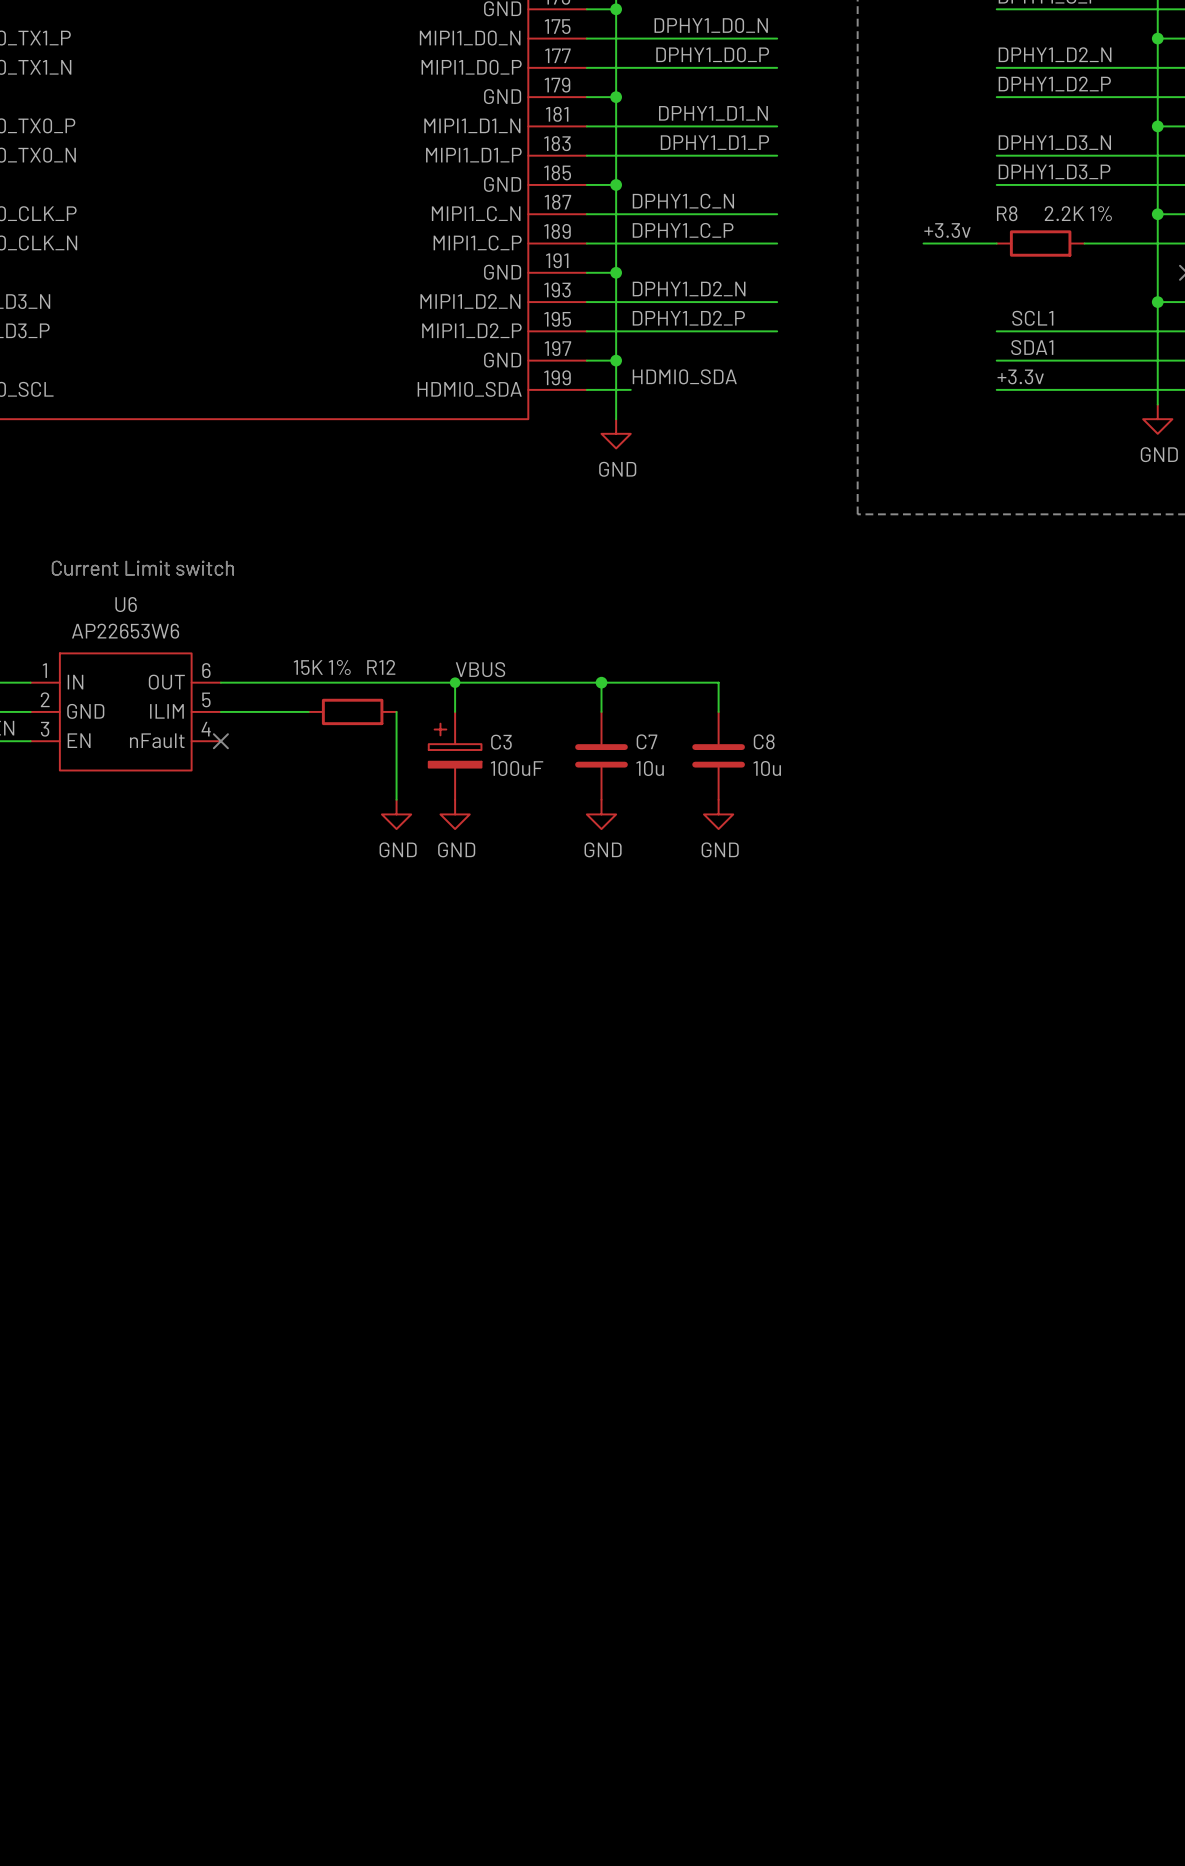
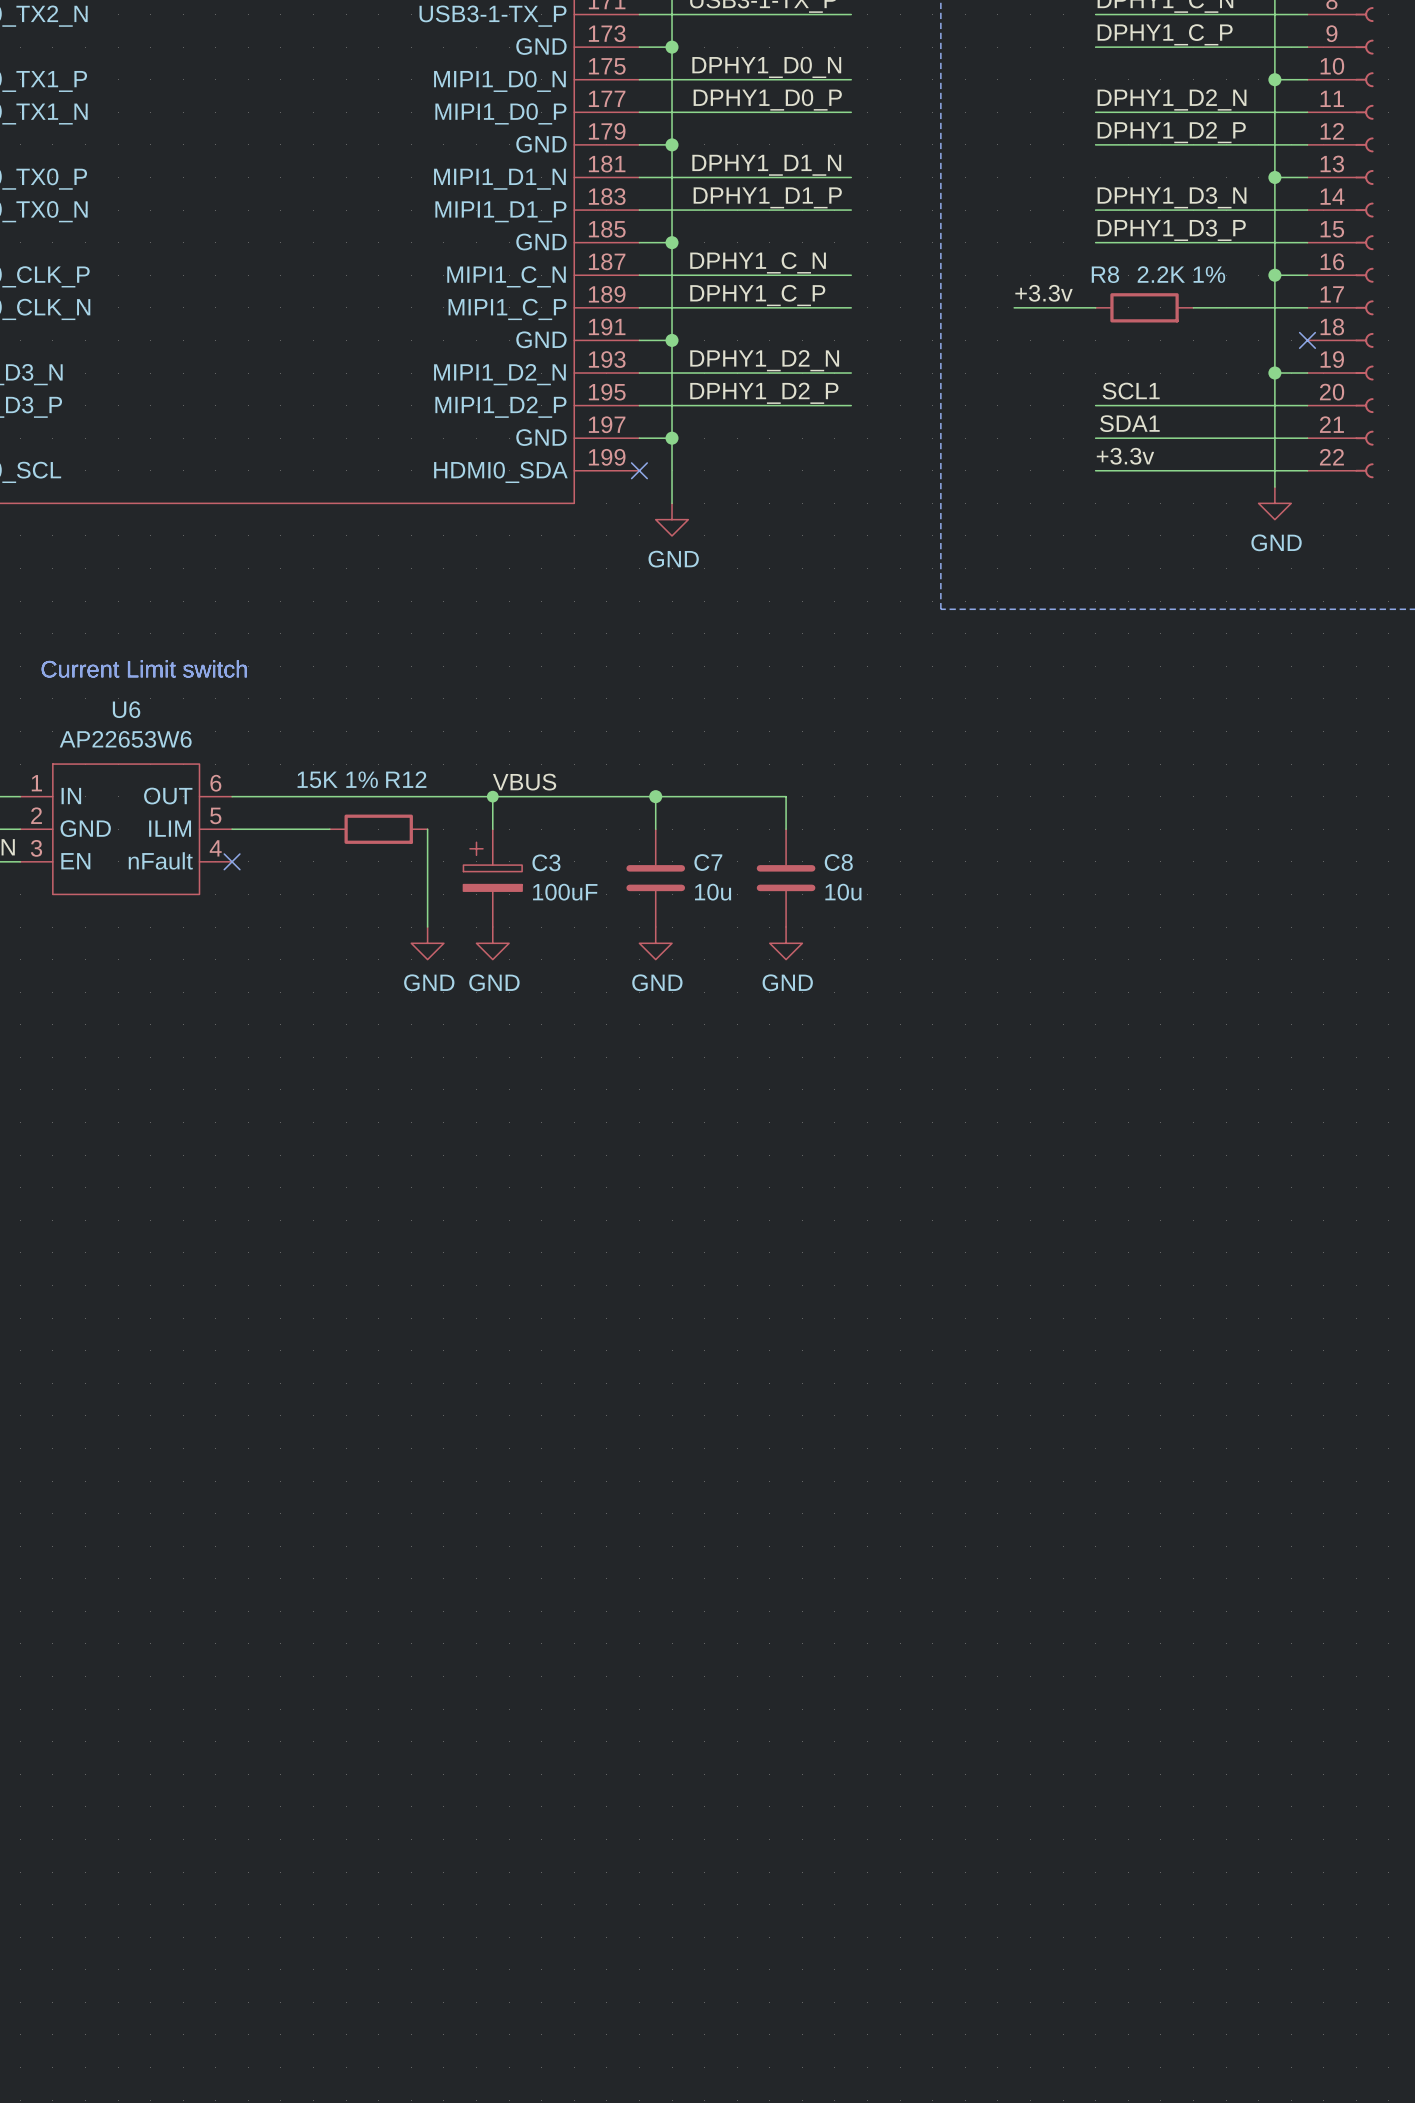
label: HDMI0_SDA (684, 376) -> none
wire: (586, 389) (630, 389) -> none
no-connect mark: none -> (639, 470)

